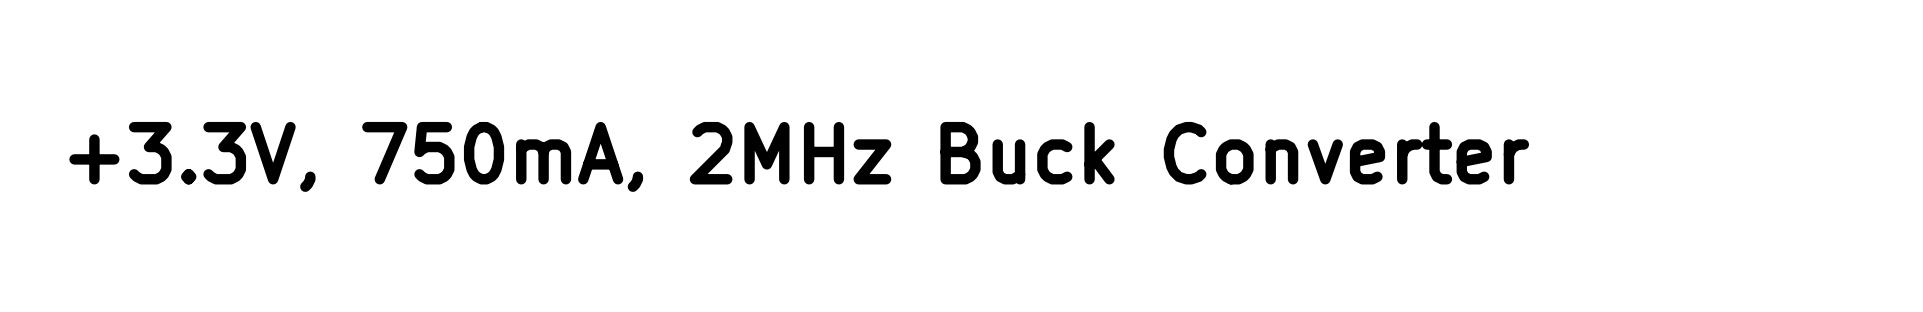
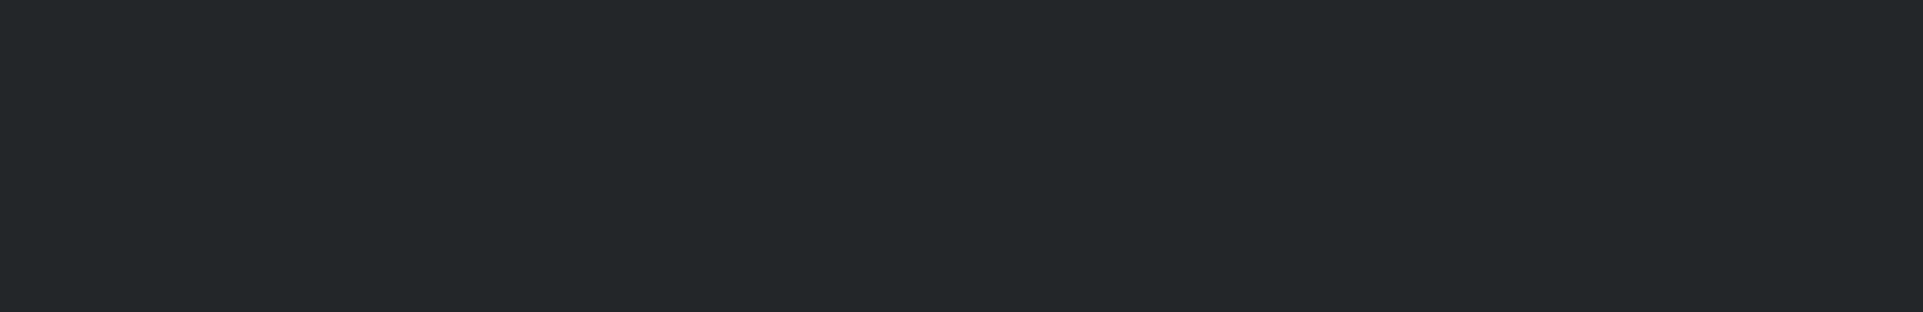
text: +3.3V, 750mA, 2MHz Buck Converter (799, 156) -> none

